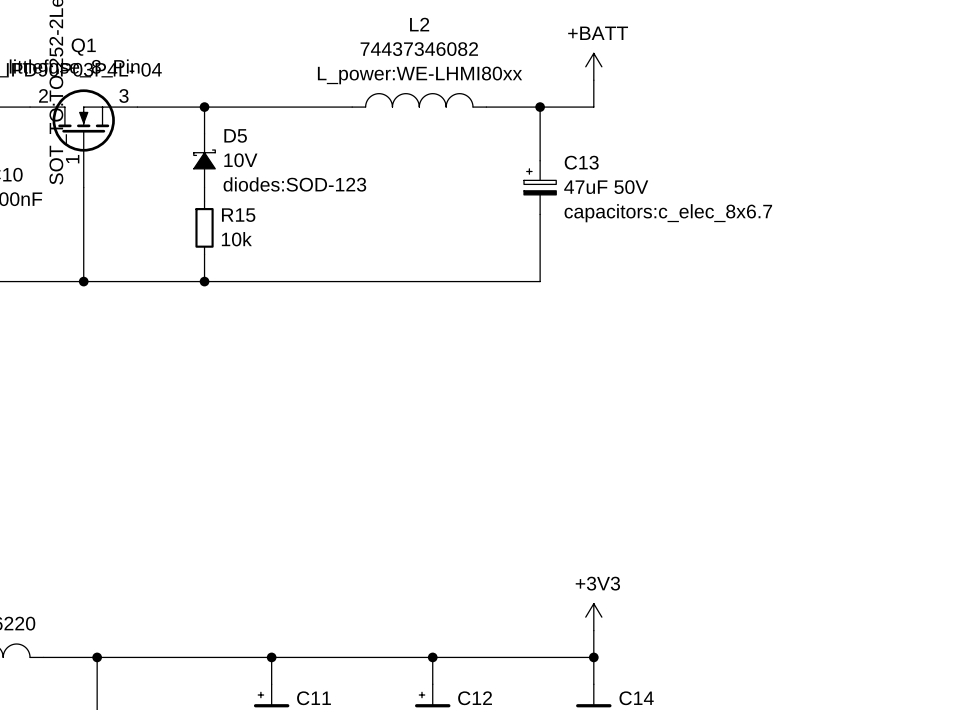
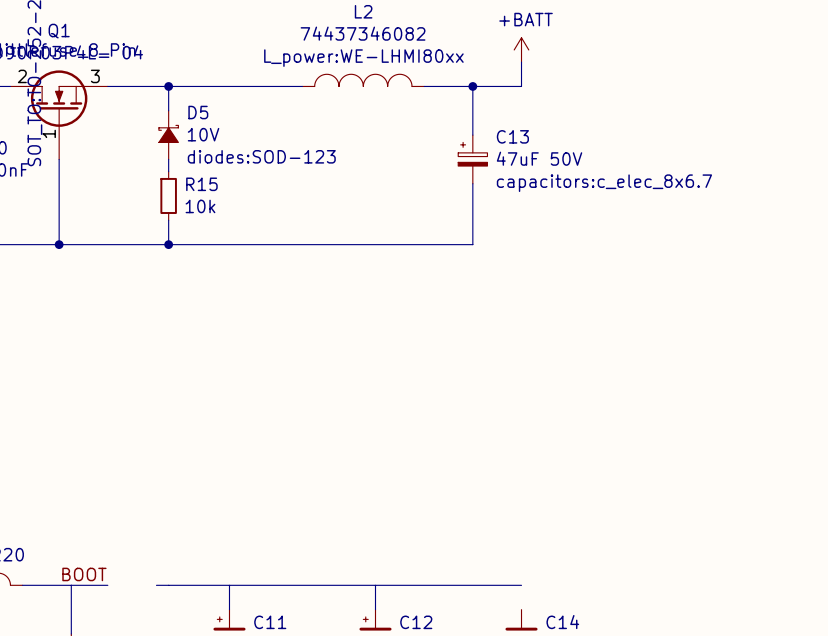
power symbol: +3V3 (593, 617) -> none
wire: (593, 630) (593, 684) -> none
label: none -> BOOT (84, 574)
junction: (97, 657) -> none
wire: (137, 657) (191, 657) -> none
junction: (271, 657) -> none
junction: (432, 657) -> none
junction: (593, 657) -> none

